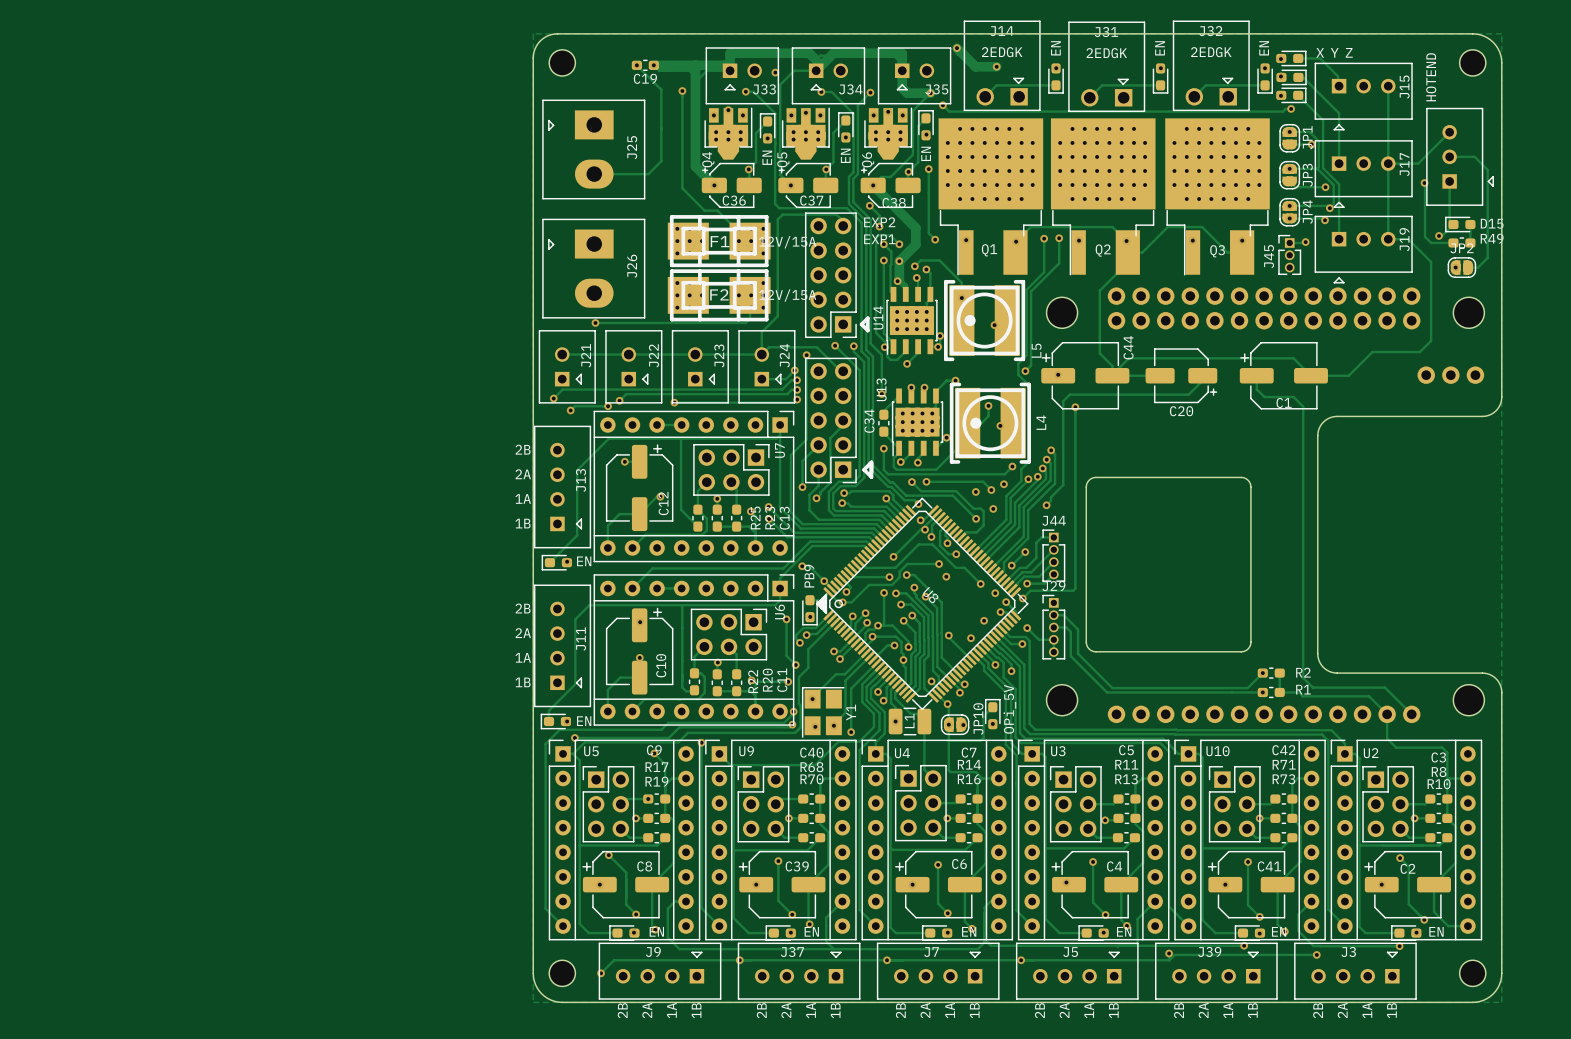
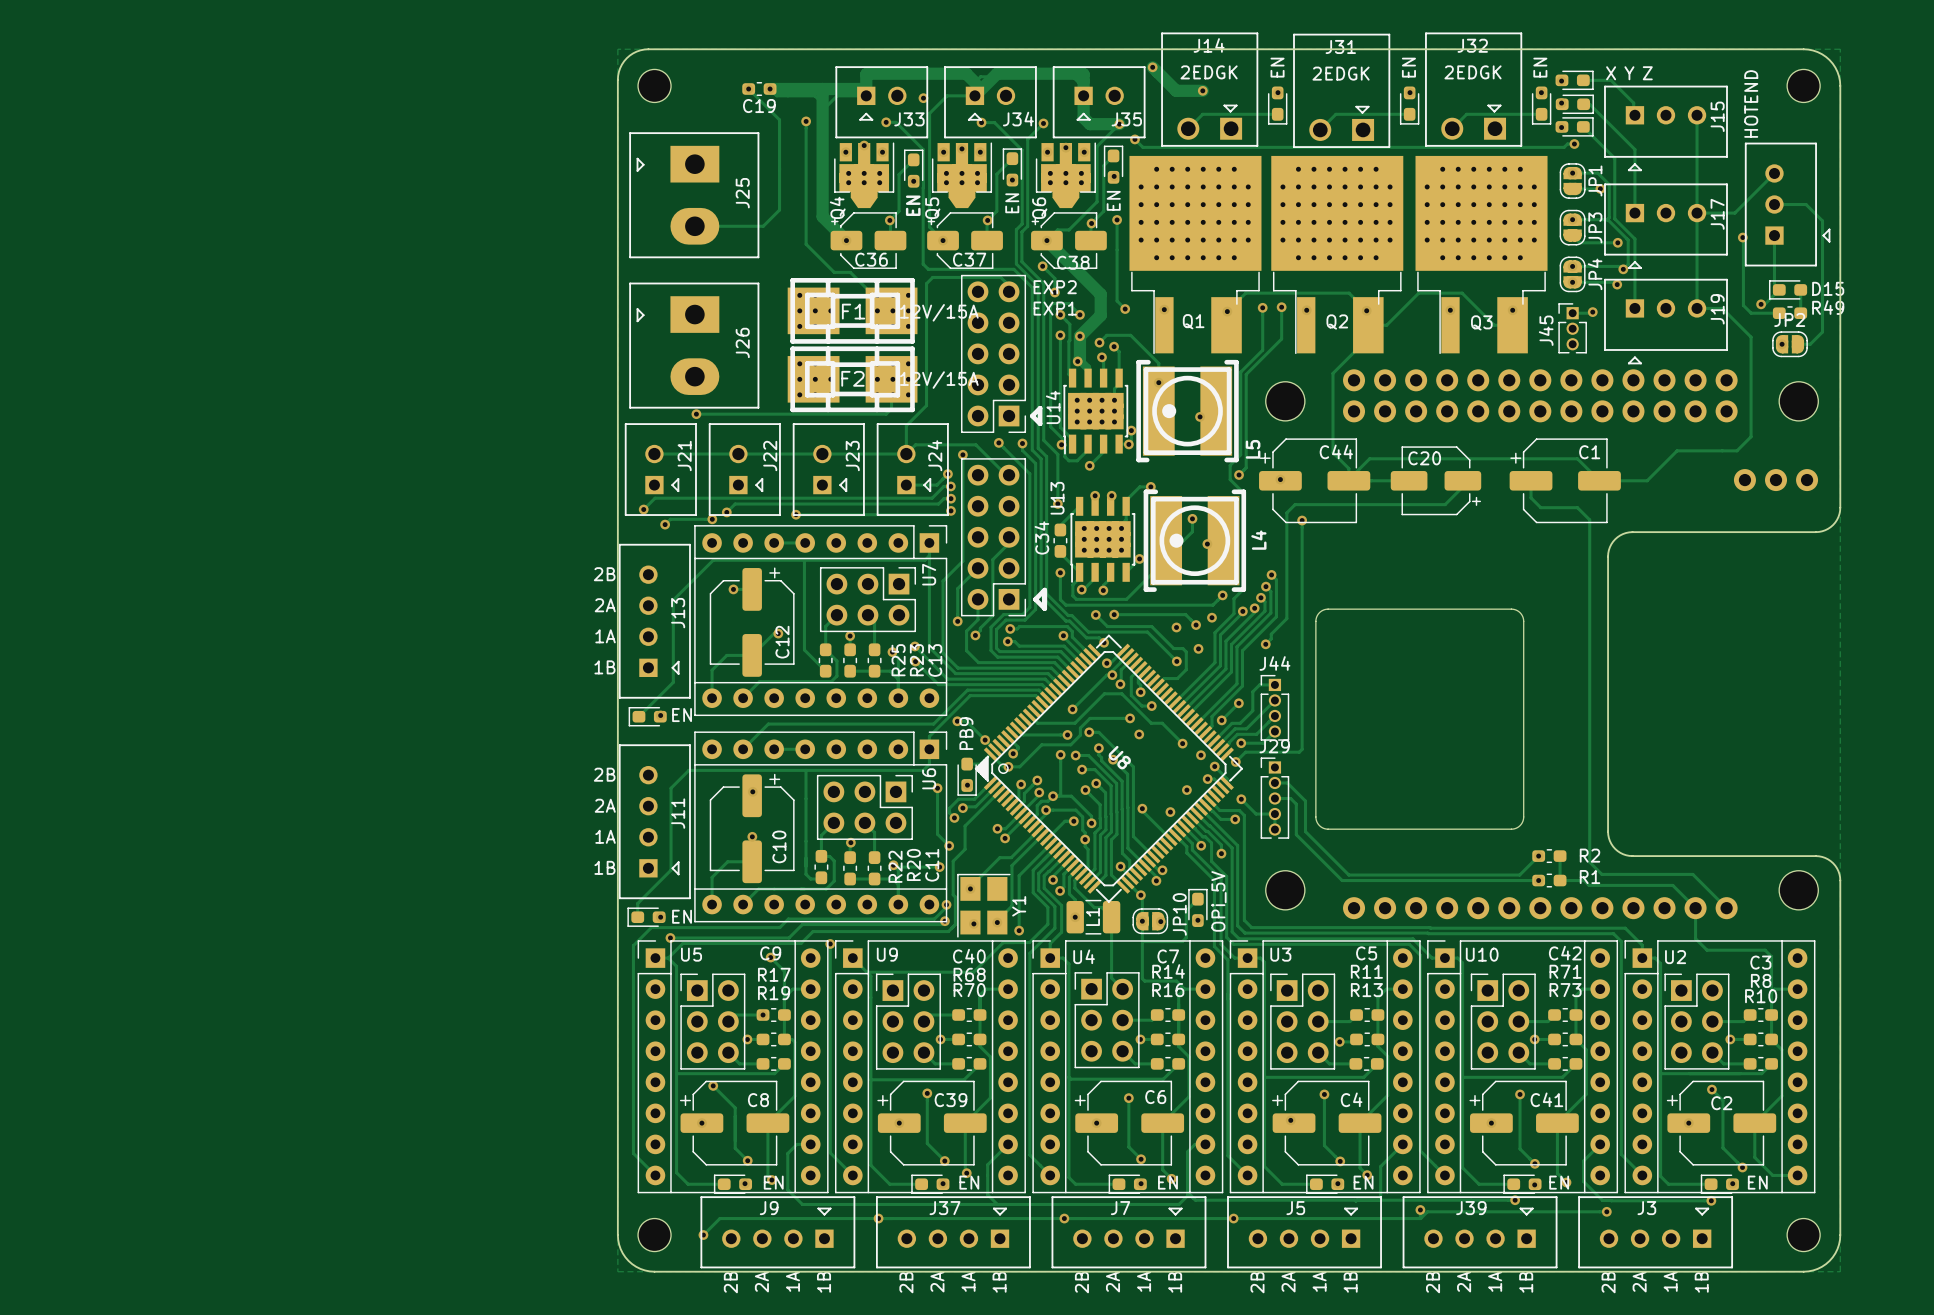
C44 name rotation: 0° (1128, 347) -> 90° clockwise (1336, 451)
C1 name position: C1 (1284, 402) -> C1 (1589, 452)
C20 name position: C20 (1181, 411) -> C20 (1424, 458)

